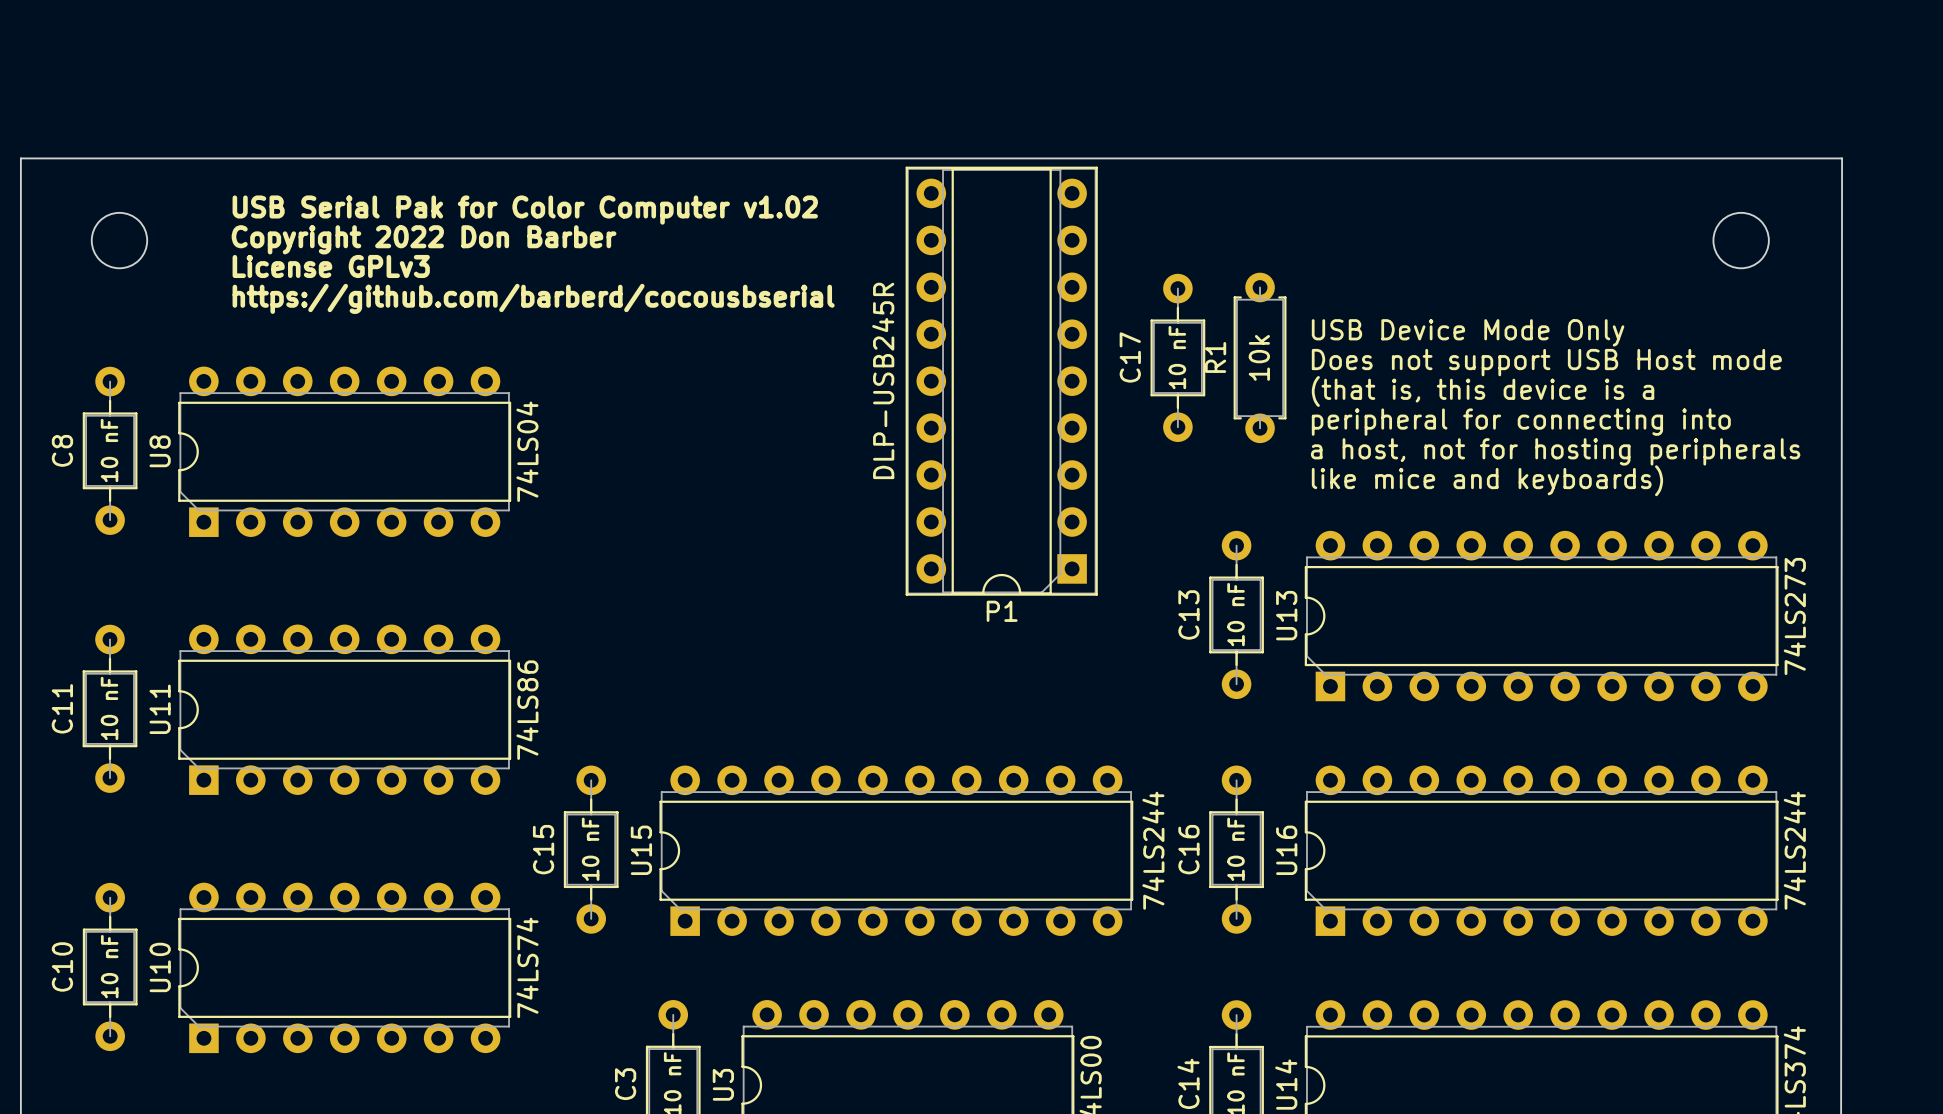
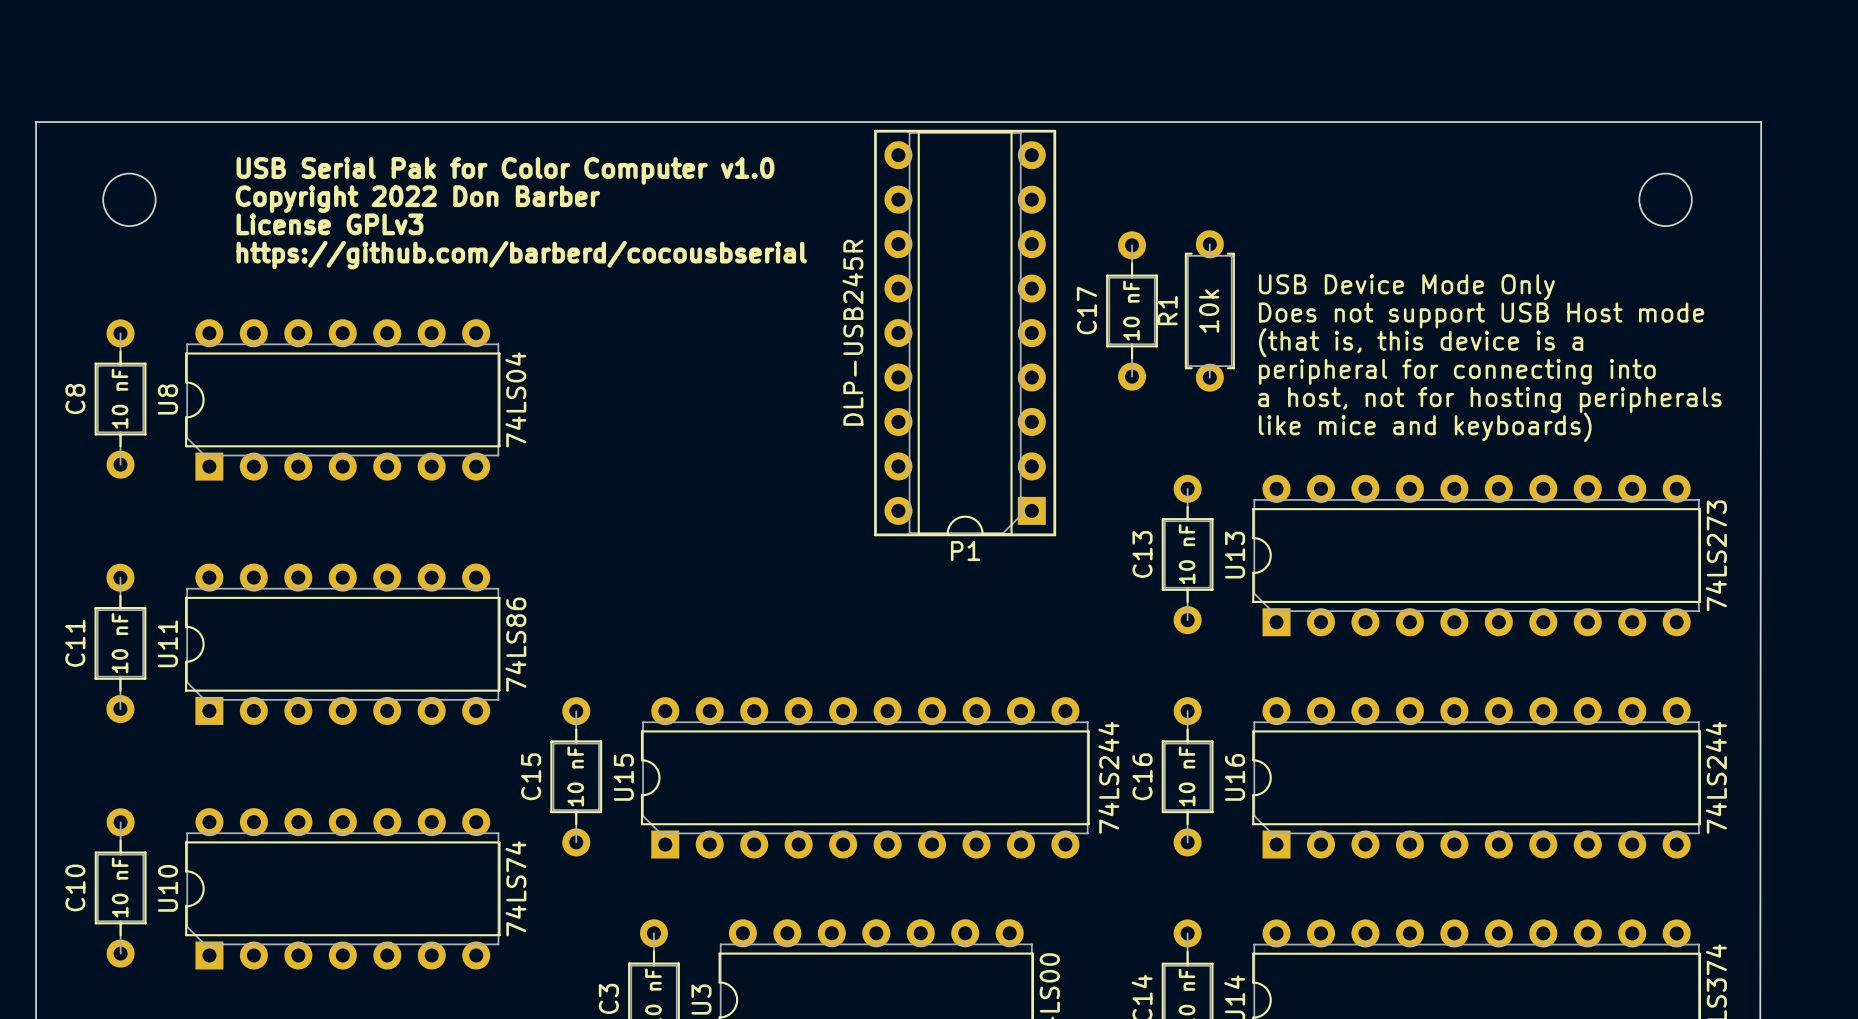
text: USB Serial Pak for Color Computer v1.02 (525, 210) -> USB Serial Pak for Color Computer v1.0 (505, 170)

